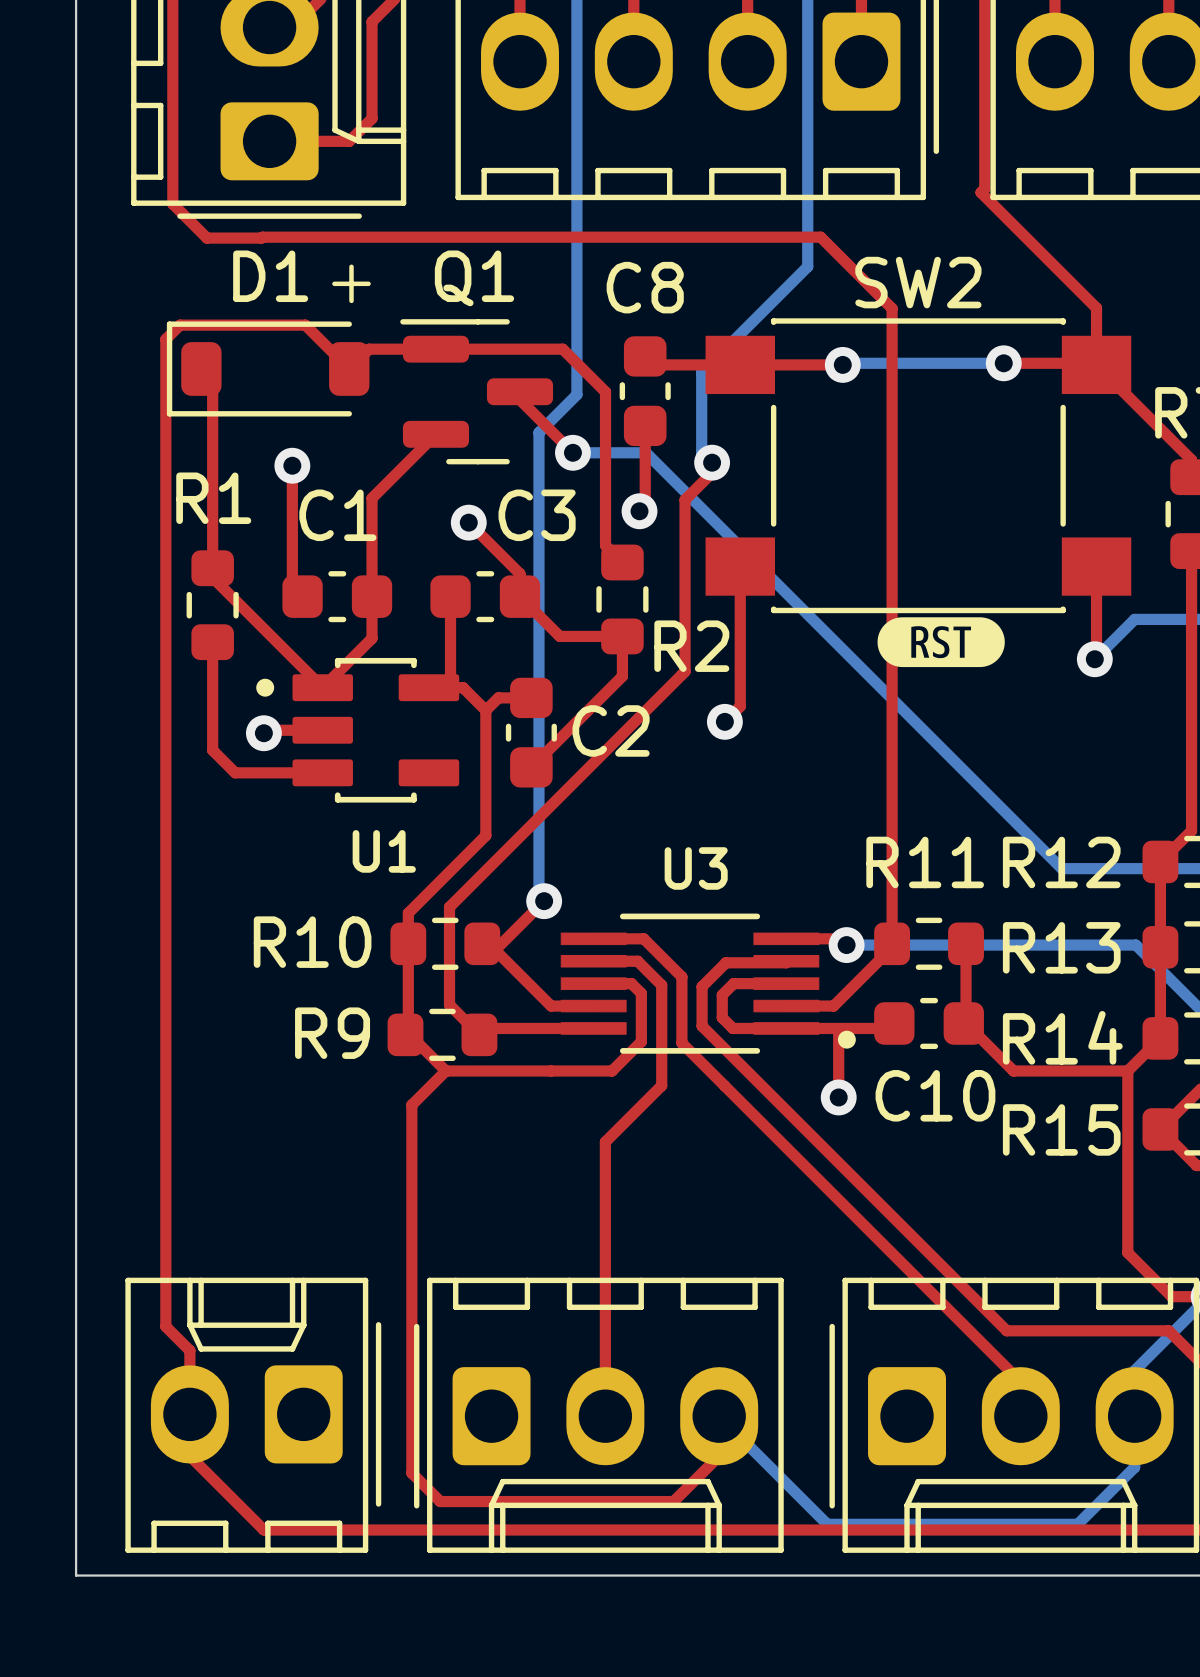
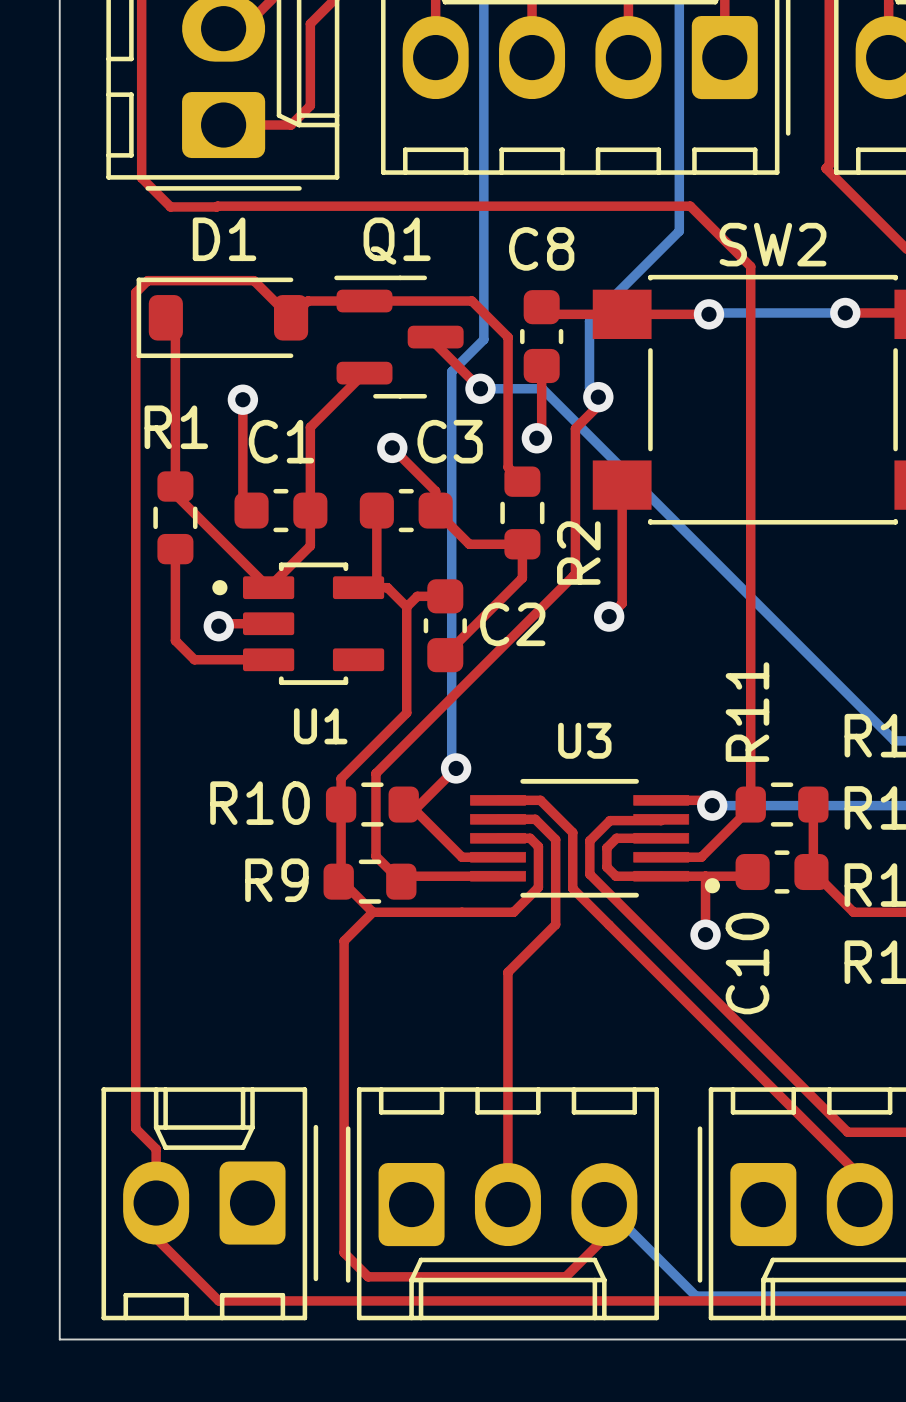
text: + (351, 283) -> none
drawing: [877, 617, 1005, 668] -> none
R2 name rotation: 0° (691, 646) -> 90° counterclockwise (578, 553)
R11 name rotation: 0° (925, 862) -> 90° counterclockwise (747, 712)
C10 name rotation: 0° (935, 1095) -> 90° counterclockwise (747, 963)

